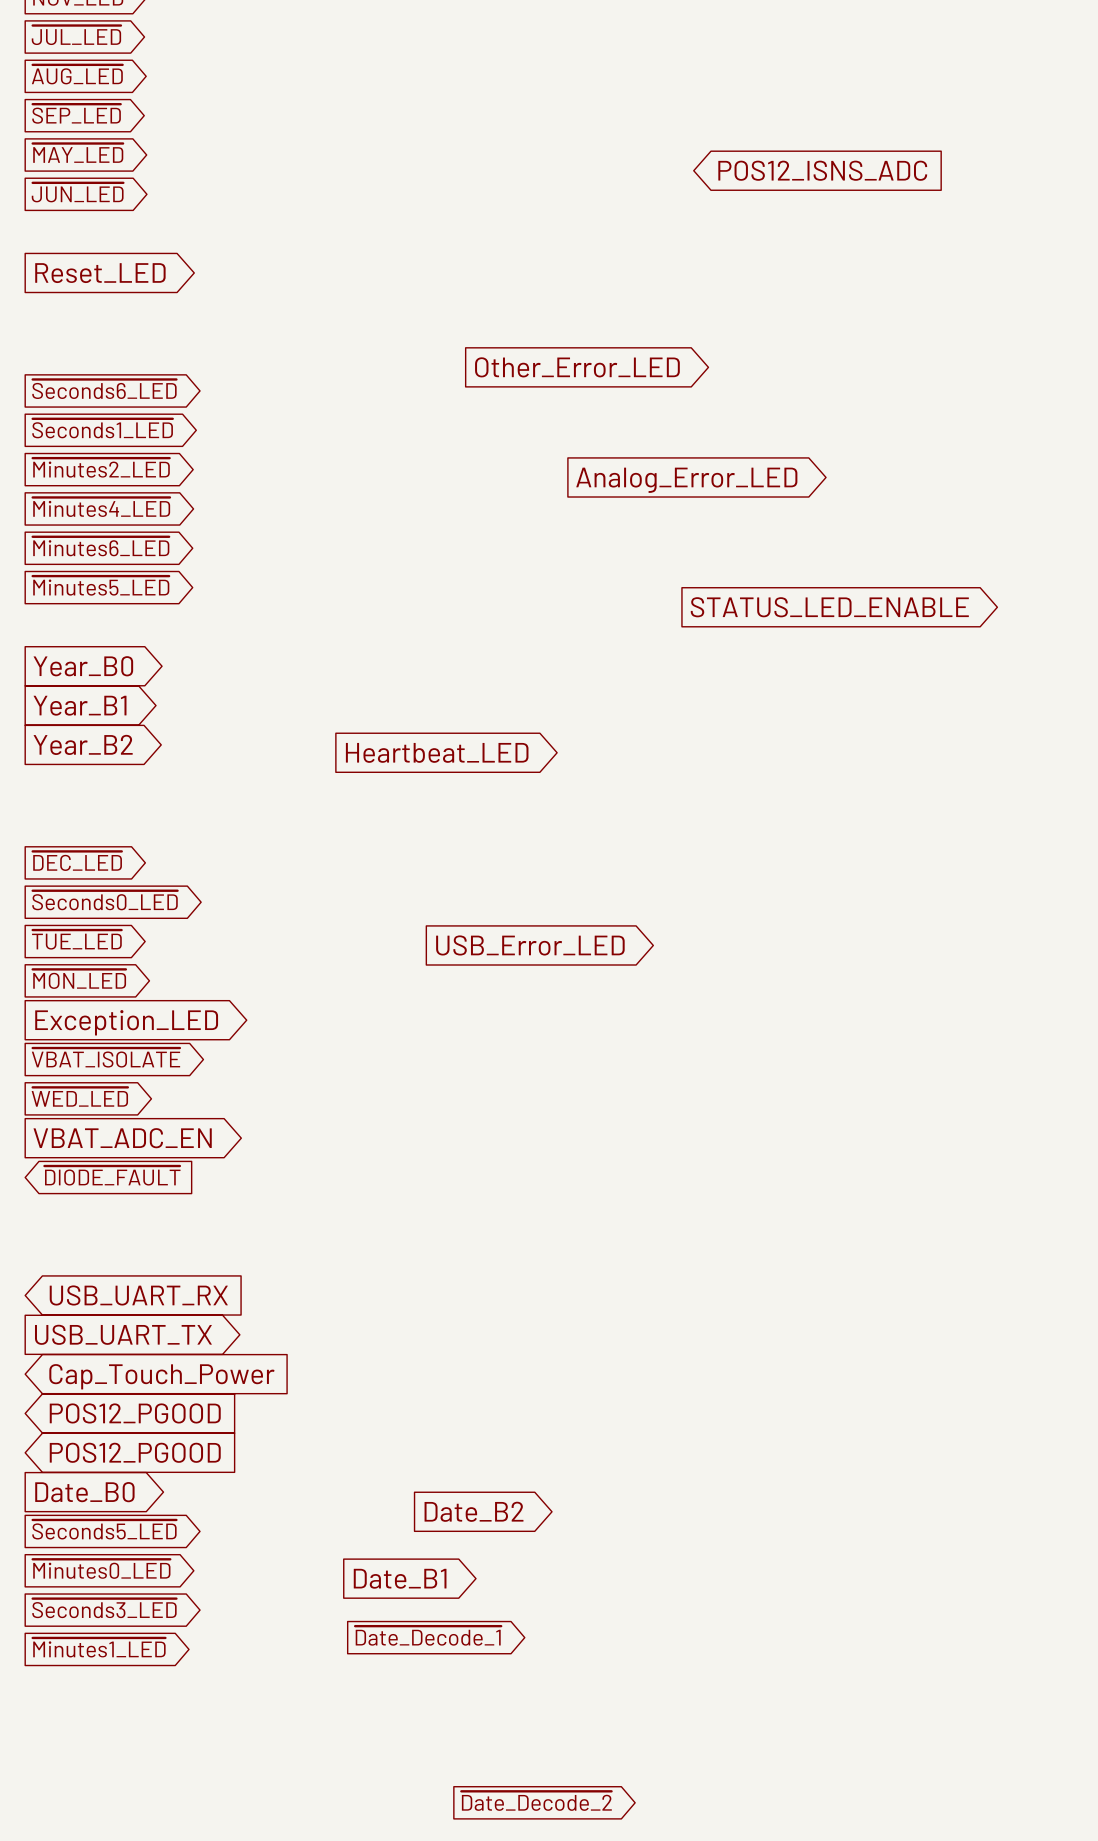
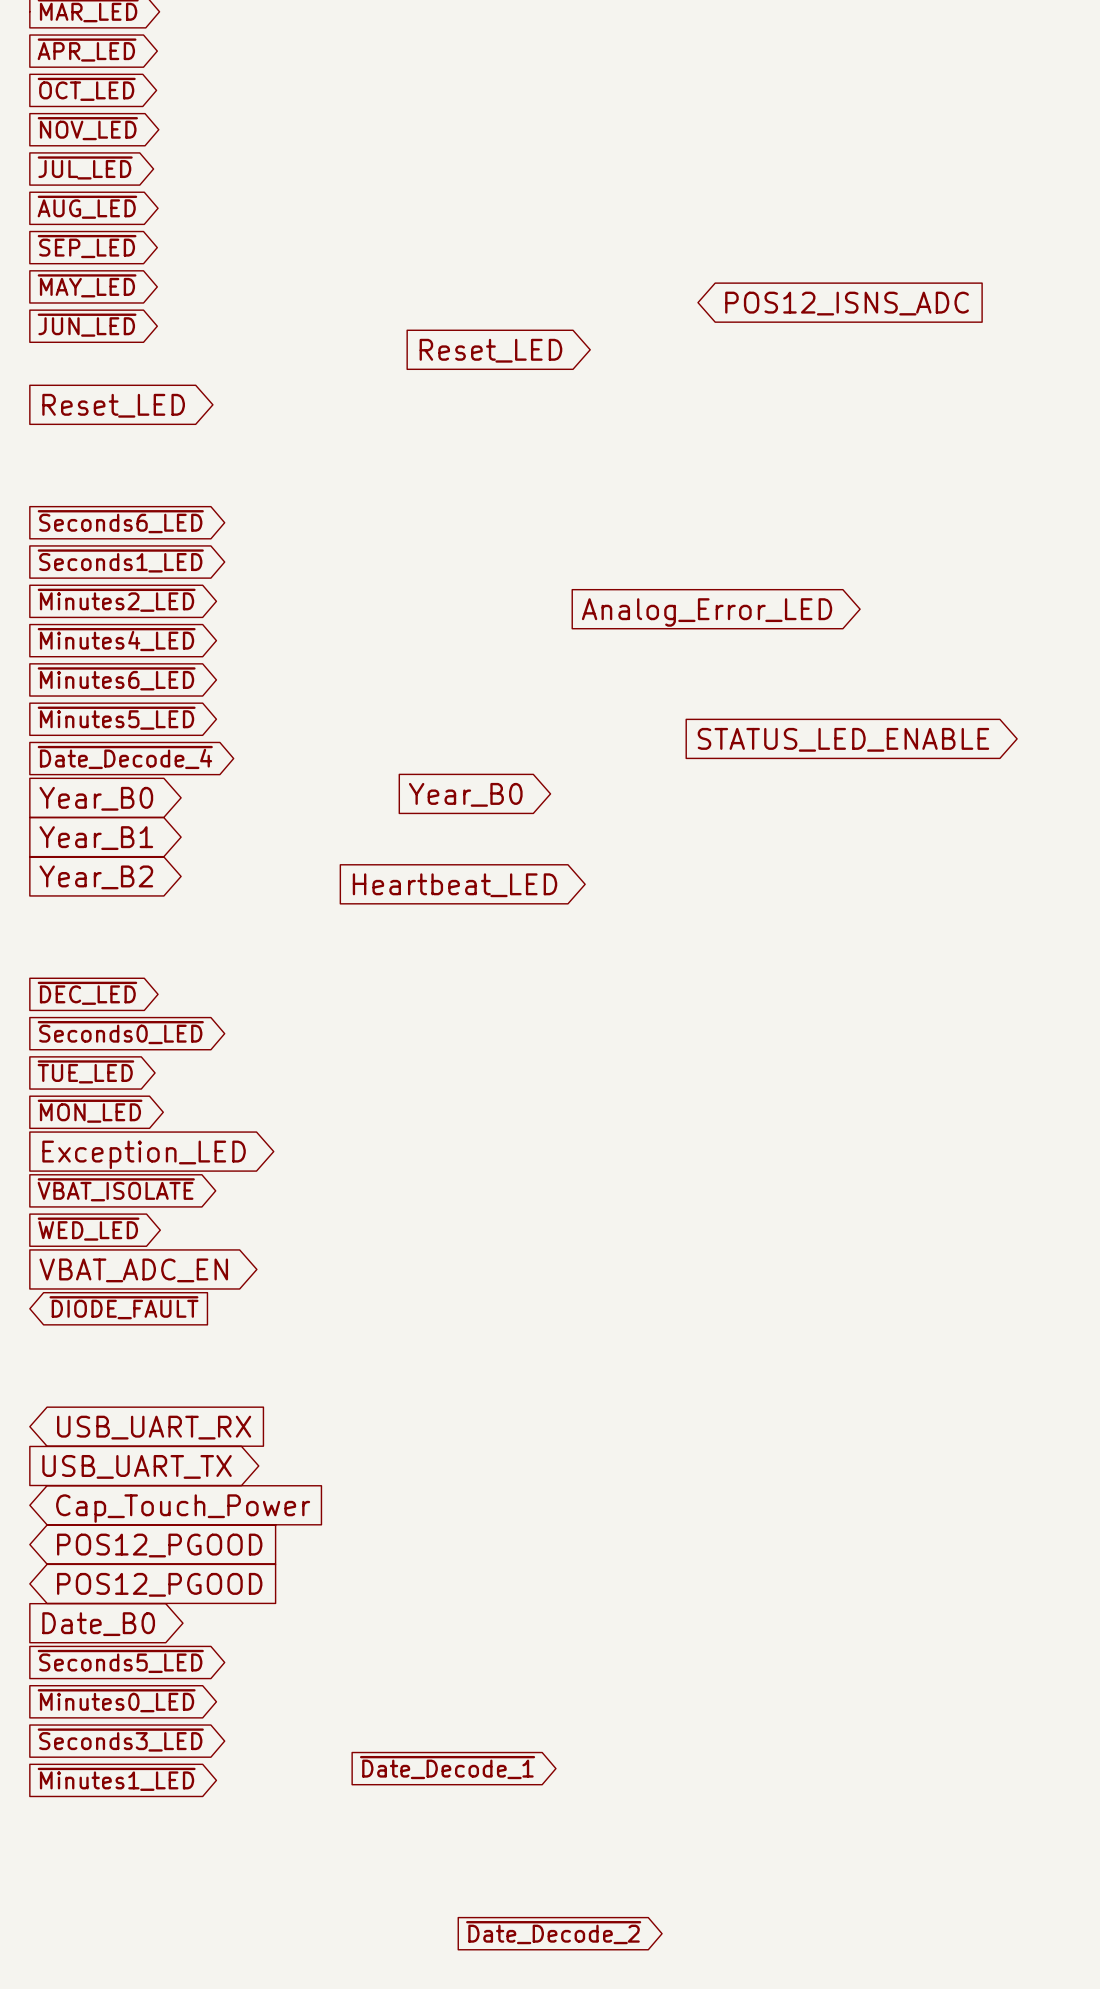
global label: none -> Reset_LED (490, 350)
global label: Other_Error_LED (577, 367) -> none
global label: none -> ~{Date_Decode_4} (125, 757)
global label: none -> Year_B0 (465, 794)
global label: USB_Error_LED (530, 945) -> none
global label: Date_B2 (474, 1511) -> none
global label: Date_B1 (400, 1578) -> none

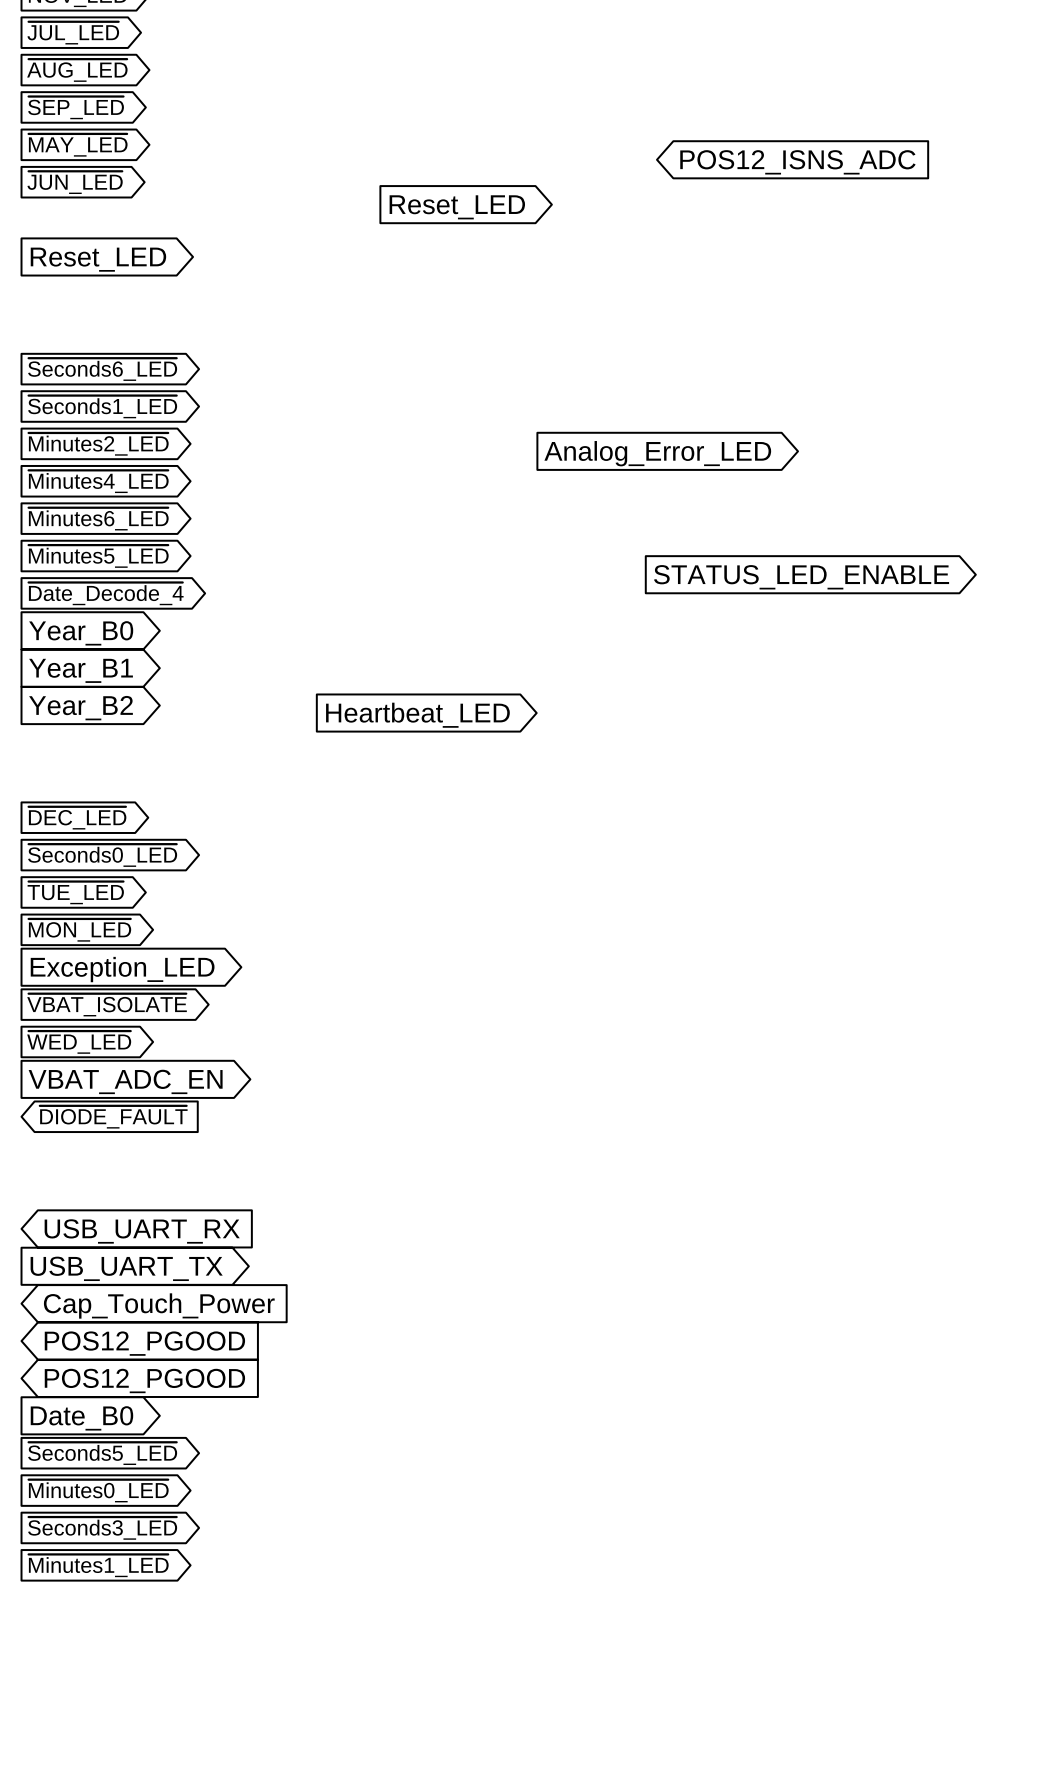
global label: Year_B0 (465, 794) -> none
global label: ~{Date_Decode_1} (447, 1767) -> none
global label: ~{Date_Decode_2} (553, 1932) -> none

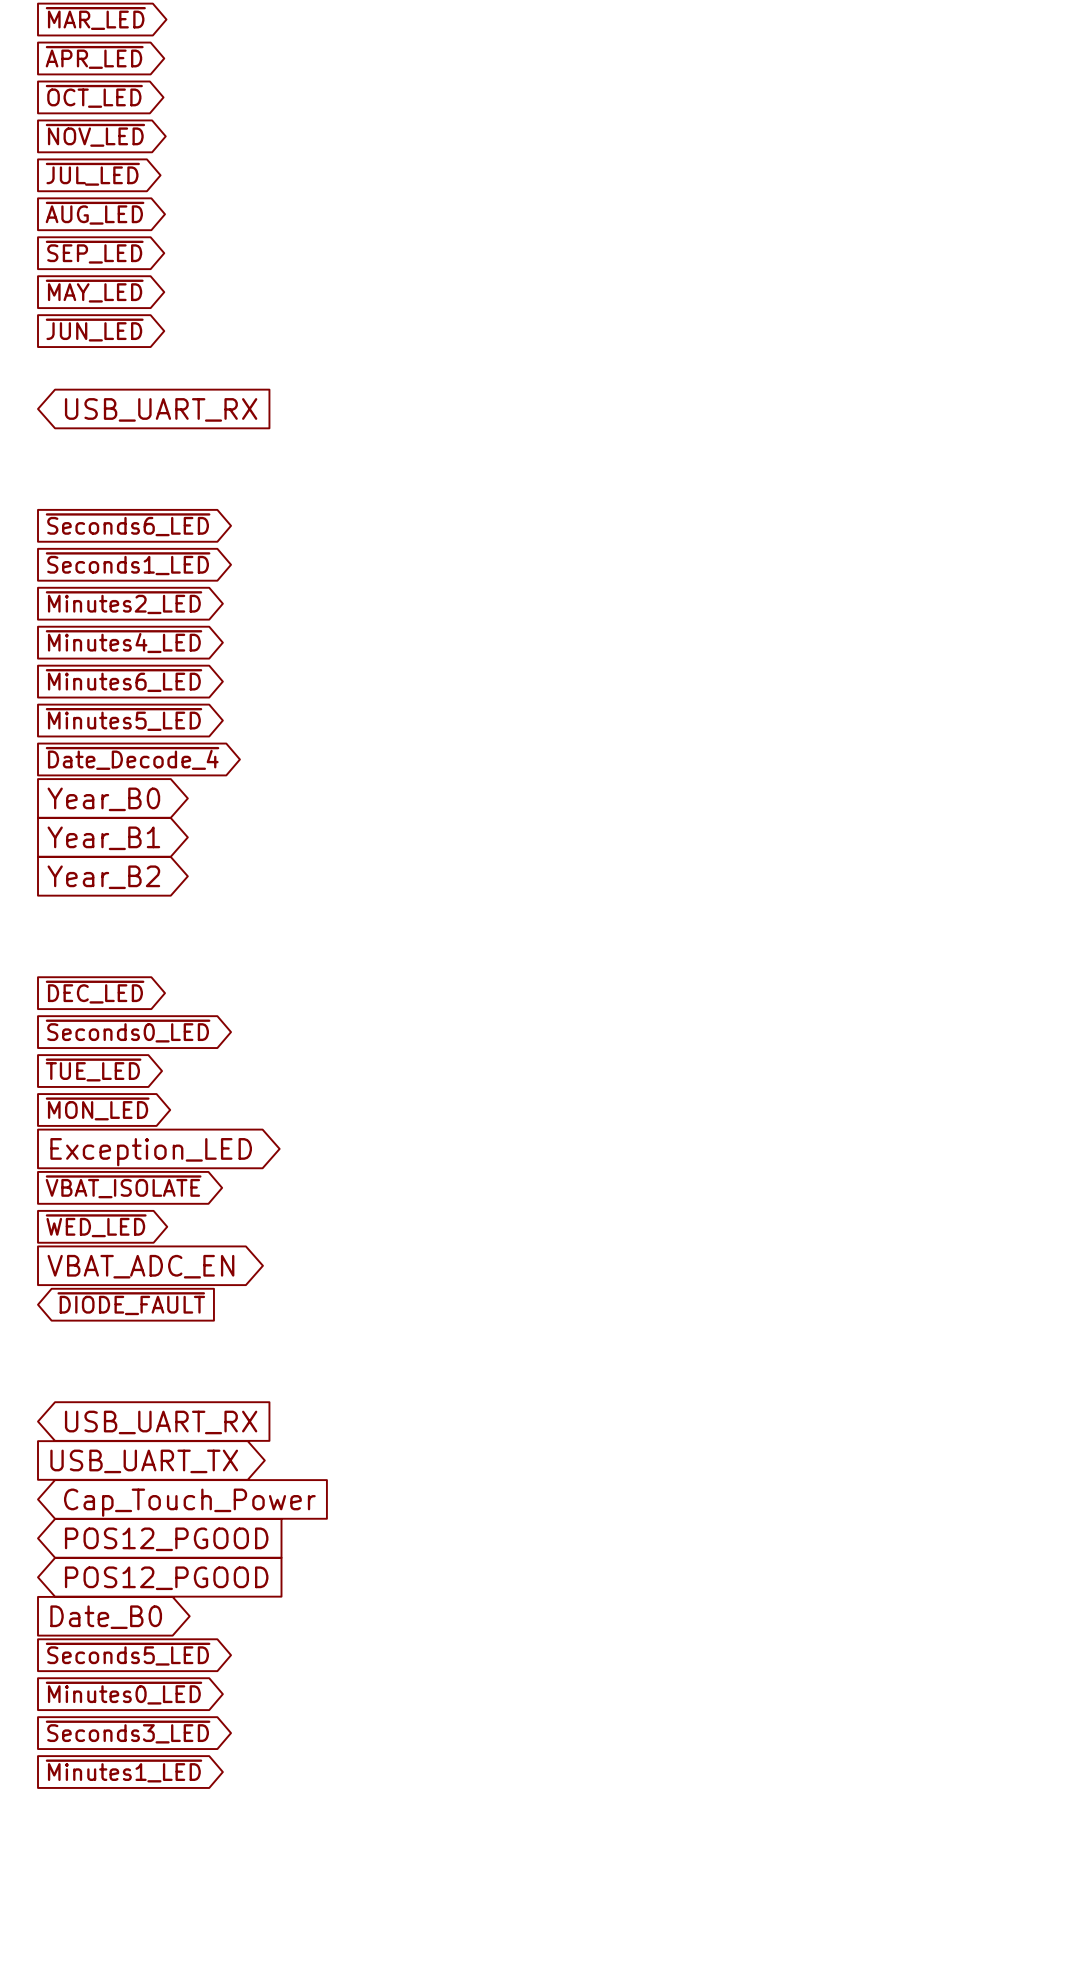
global label: POS12_ISNS_ADC (797, 162) -> none
global label: Reset_LED (457, 207) -> none
global label shape: output (98, 259) -> input (161, 409)
global label: Reset_LED (98, 259) -> USB_UART_RX (161, 409)
global label: Analog_Error_LED (657, 453) -> none
global label: STATUS_LED_ENABLE (801, 577) -> none
global label: Heartbeat_LED (417, 715) -> none

